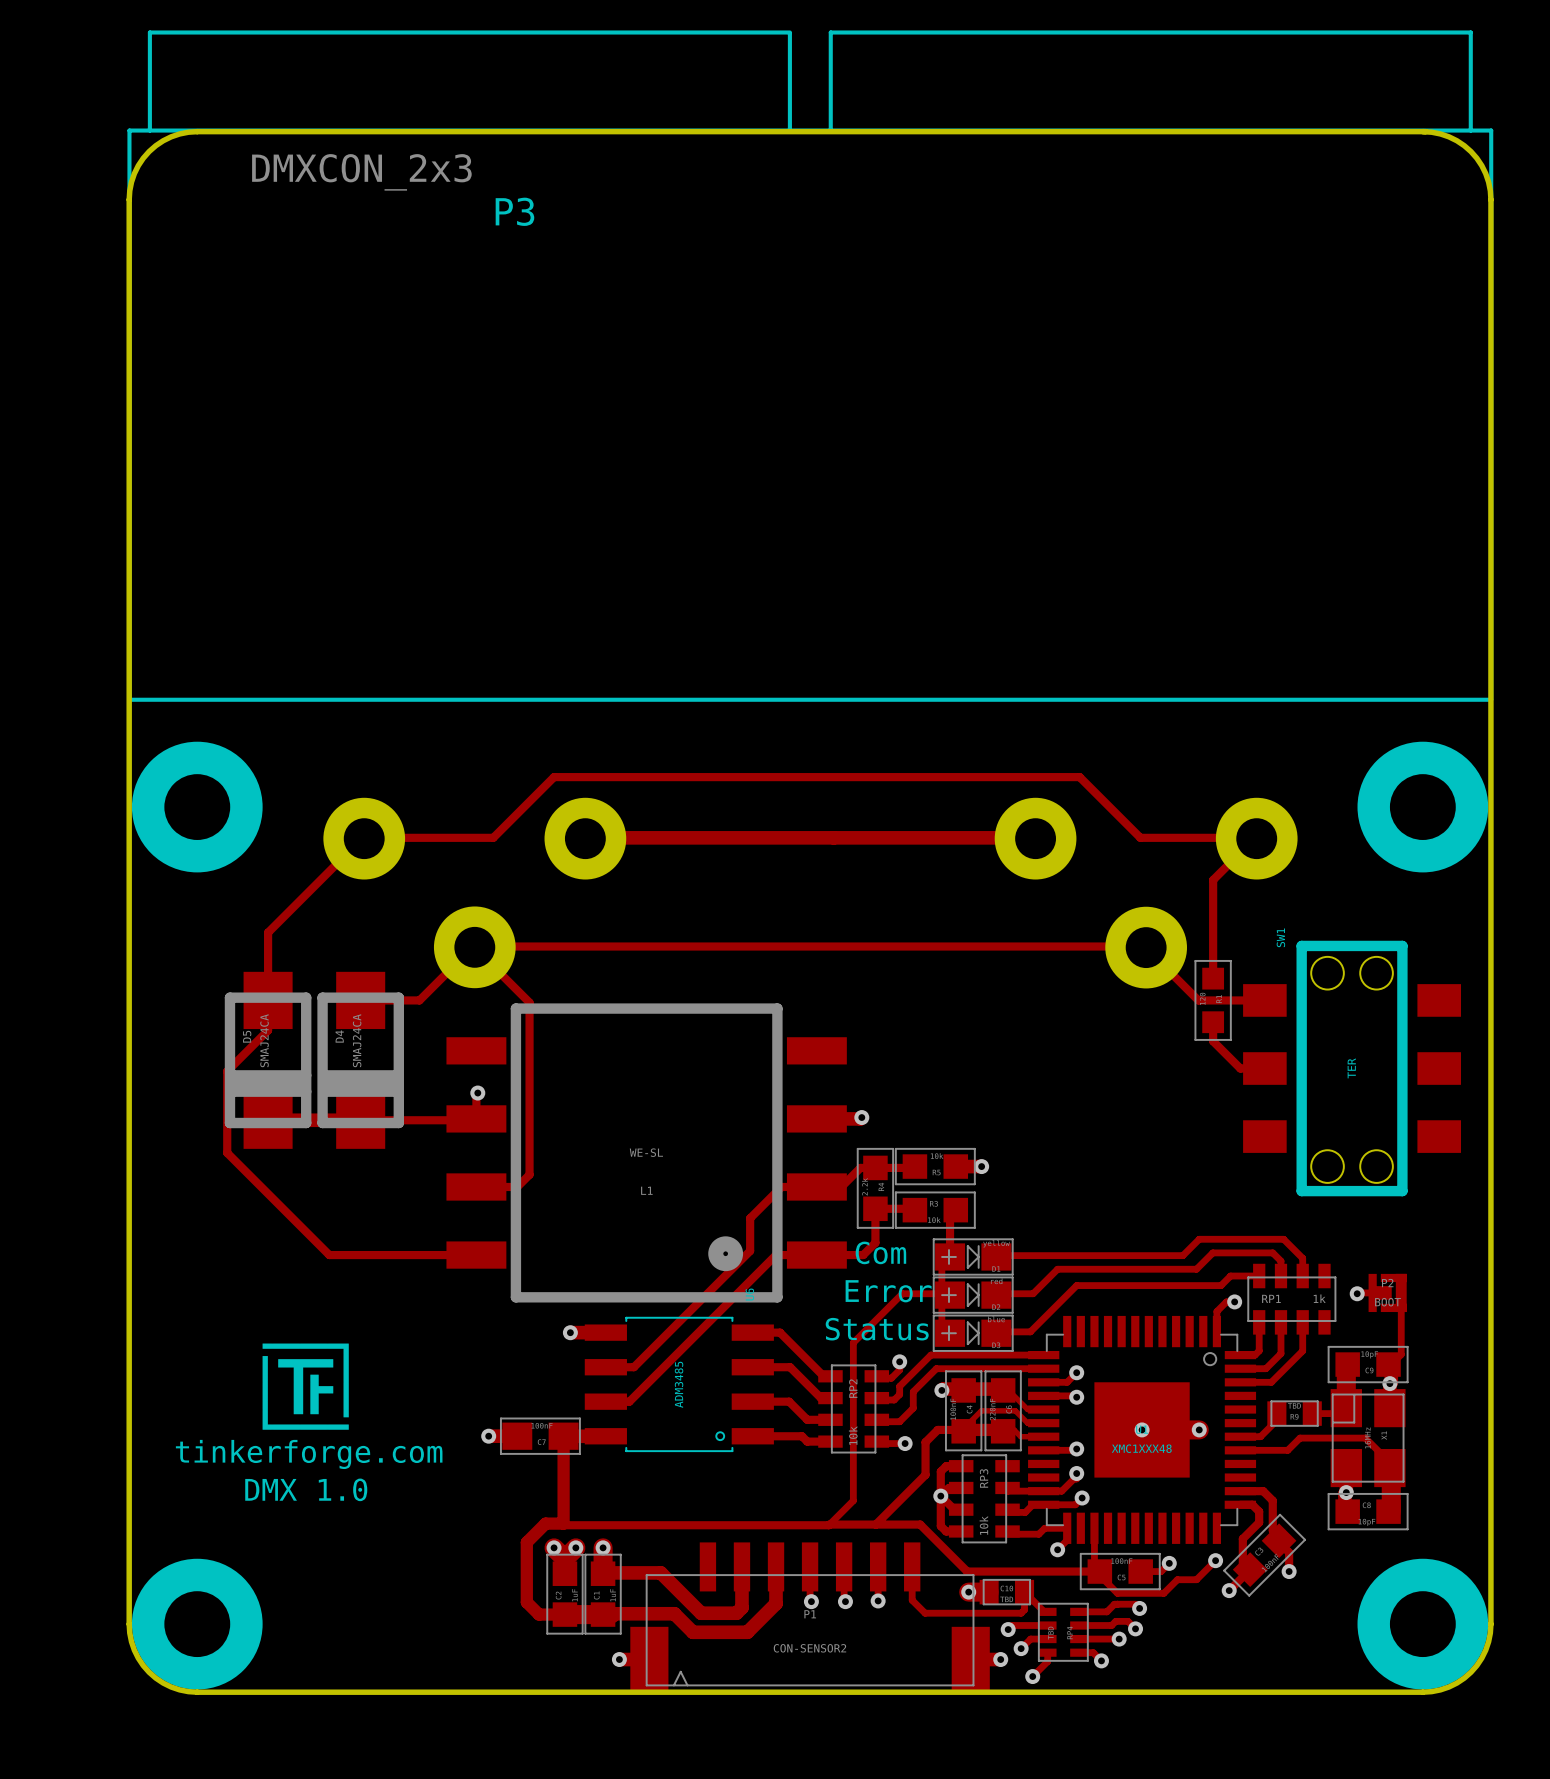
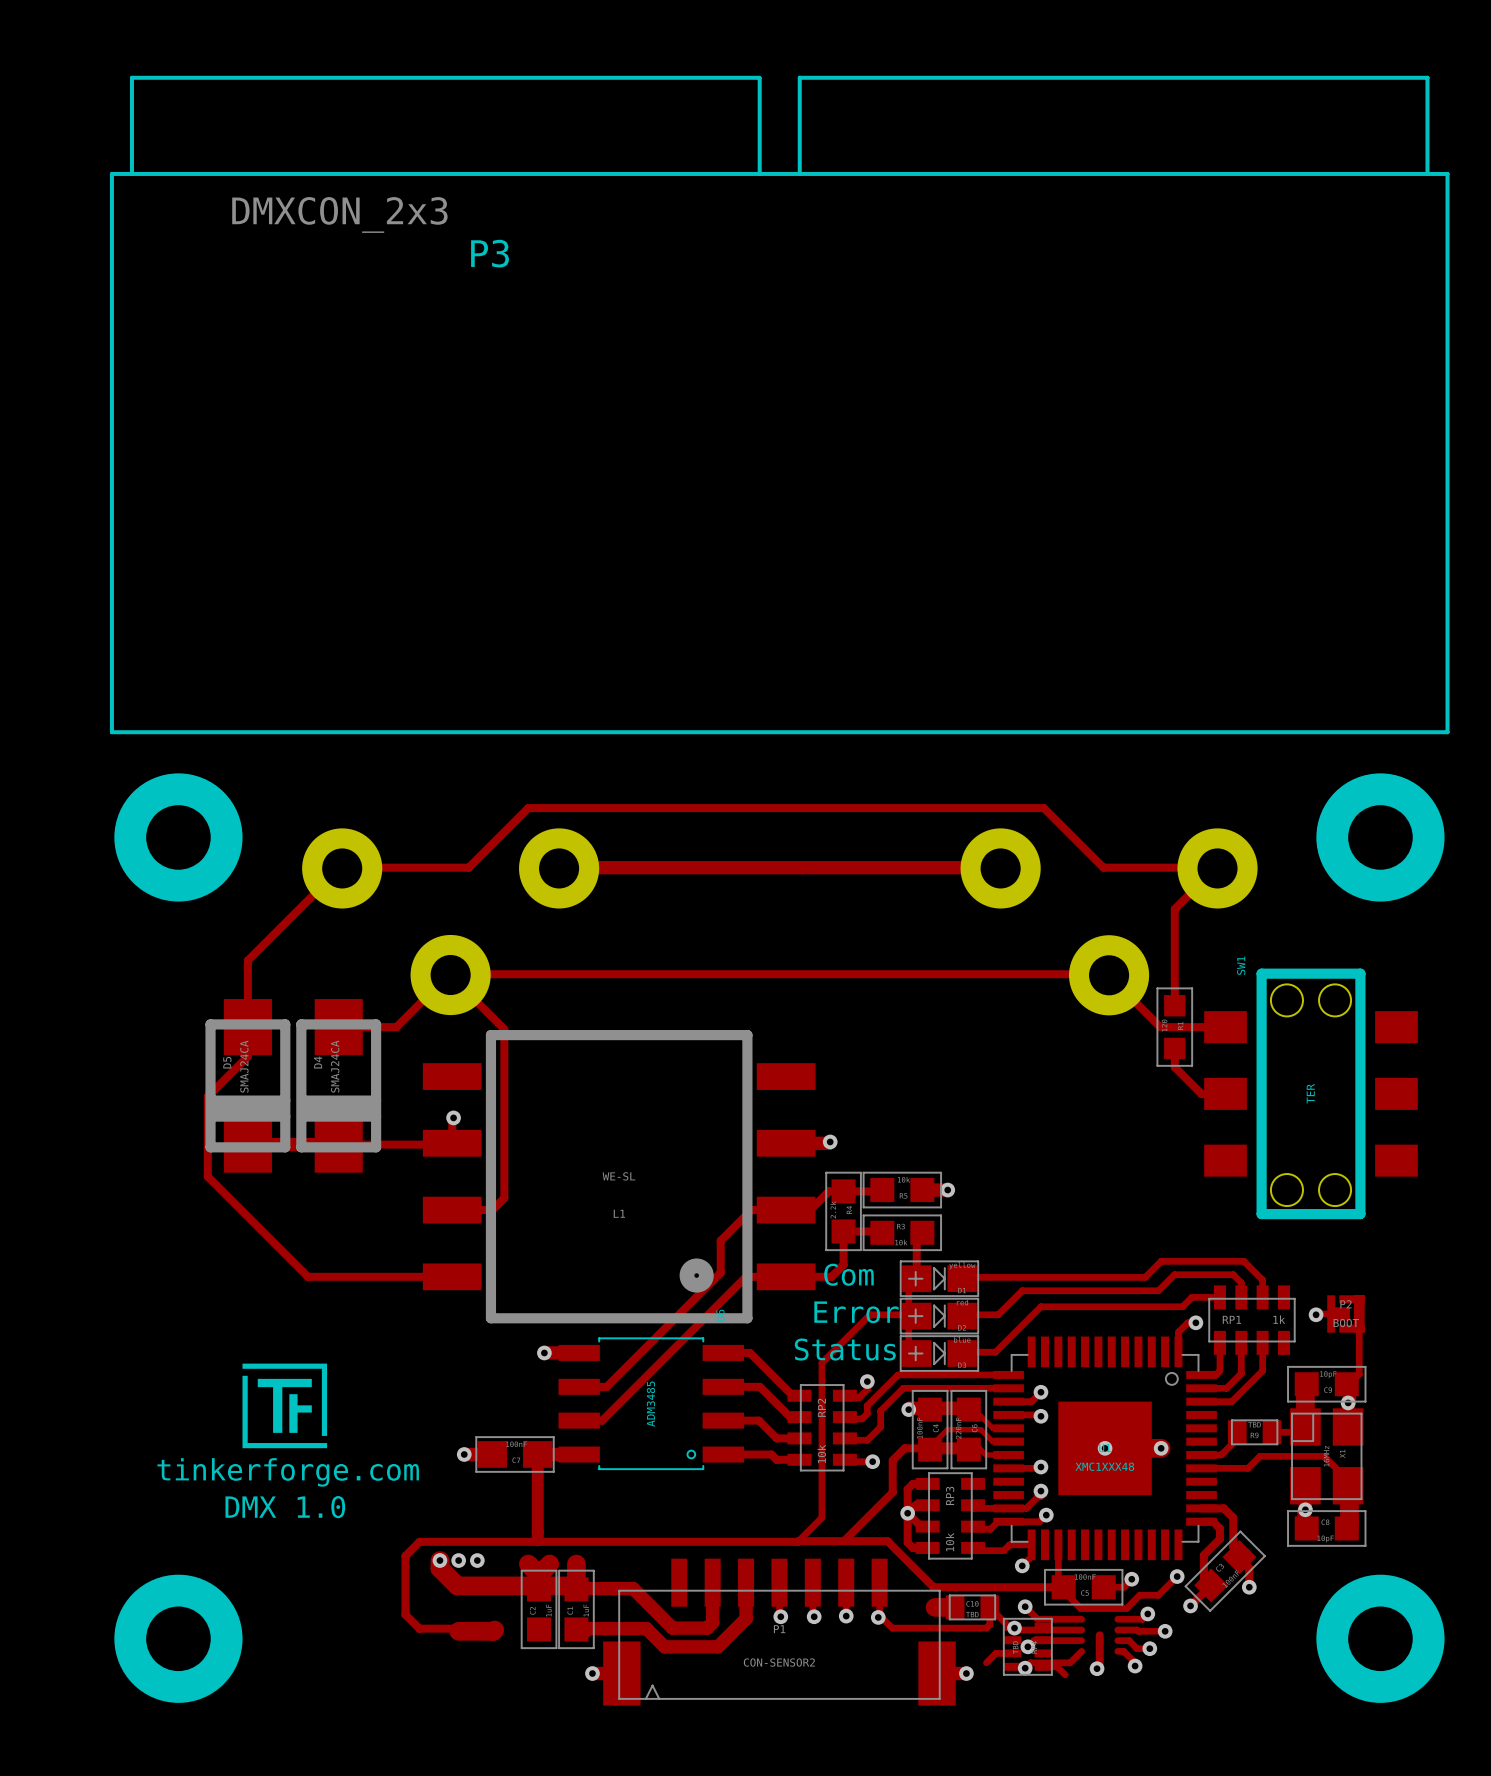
board edge: (1422, 131) (1431, 132) (1448, 136) (1471, 151) (1485, 173) (1490, 199) (1490, 1624) (1488, 1641) (1476, 1665) (1464, 1678) (1448, 1687) (1422, 1692) (197, 1692) (179, 1689) (155, 1678) (138, 1658) (131, 1641) (129, 1624) (129, 199) (131, 182) (143, 158) (155, 145) (171, 136) (197, 131) (1425, 131) -> none
track: (561, 1525) (563, 1523) (545, 1523) (526, 1542) (526, 1602) (539, 1614) (603, 1614) -> (536, 1541) (419, 1541) (405, 1555) (405, 1614) (419, 1628) (458, 1628)
track: none -> (439, 1560) (439, 1568) (457, 1585) (576, 1585)
via: none -> (439, 1560)
via: none -> (458, 1560)
via: none -> (477, 1560)
via: (554, 1547) -> none
via: (575, 1547) -> none
via: (603, 1547) -> none
via: none -> (1025, 1606)
via: (968, 1592) -> none
track: none -> (1147, 1613) (1142, 1619) (1117, 1619)
via: none -> (1147, 1613)
via: none -> (878, 1617)
track: (1114, 1604) (1106, 1611) (1079, 1611) -> (1078, 1619) (1037, 1619) (1025, 1606)
via: (1139, 1608) -> none
track: none -> (1014, 1628) (1016, 1629) (1081, 1629)
via: none -> (1014, 1628)
track: none -> (494, 1629) (458, 1631)
track: none -> (1117, 1629) (1165, 1631)
via: none -> (1165, 1631)
track: none -> (1099, 1635) (1099, 1666) (1097, 1668)
track: (1047, 1625) (1012, 1625) (1008, 1629) -> none
track: (1079, 1625) (1111, 1625) (1115, 1621) (1128, 1621) (1135, 1628) -> none
track: none -> (1081, 1640) (1034, 1640) (1027, 1646)
track: none -> (1117, 1640) (1129, 1640) (1137, 1648) (1149, 1648)
via: (1135, 1628) -> none
via: (1008, 1629) -> none
via: none -> (1027, 1646)
via: none -> (1149, 1648)
track: none -> (1081, 1651) (1070, 1662) (1030, 1662) (1025, 1668)
track: none -> (1117, 1651) (1123, 1651) (1135, 1662) (1135, 1666)
track: (1079, 1639) (1119, 1639) -> none
via: (1119, 1639) -> none
via: (1021, 1648) -> none
via: none -> (1135, 1666)
track: (1047, 1652) (1047, 1661) (1032, 1676) -> none
via: none -> (1025, 1668)
via: none -> (1097, 1668)
via: (1101, 1660) -> none
via: (1032, 1676) -> none

